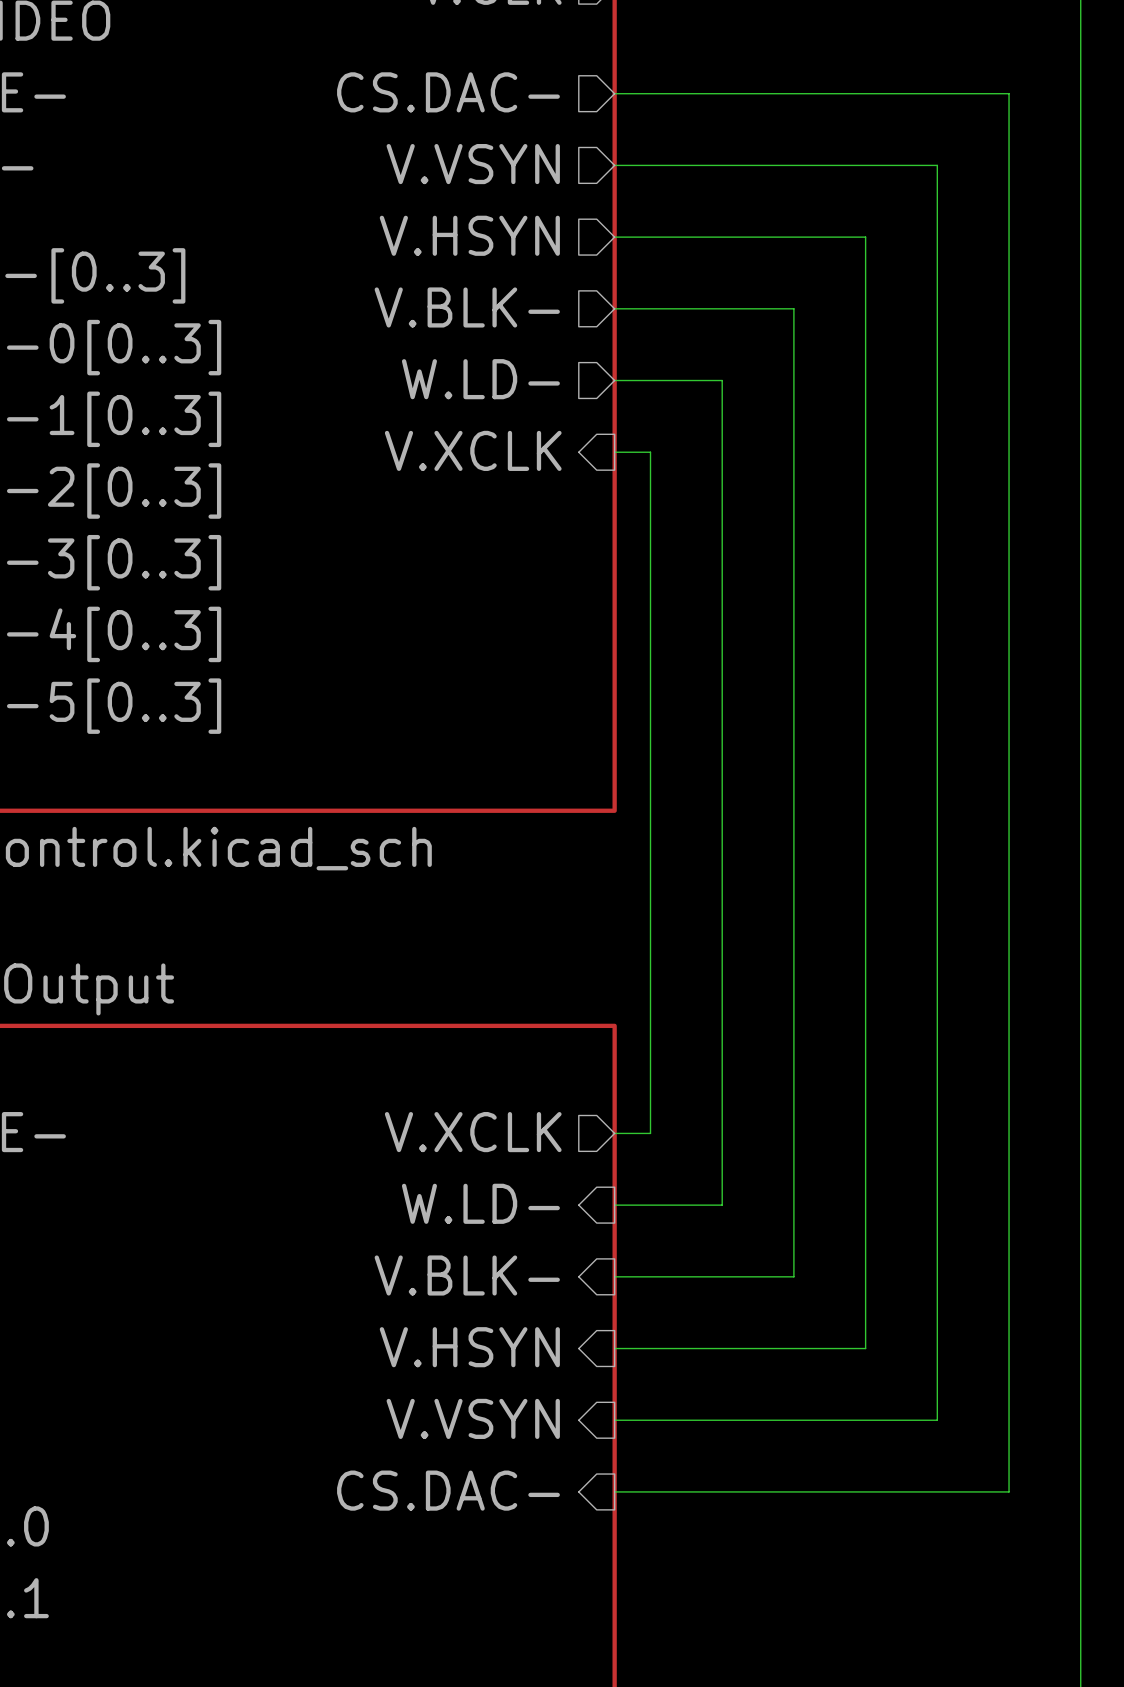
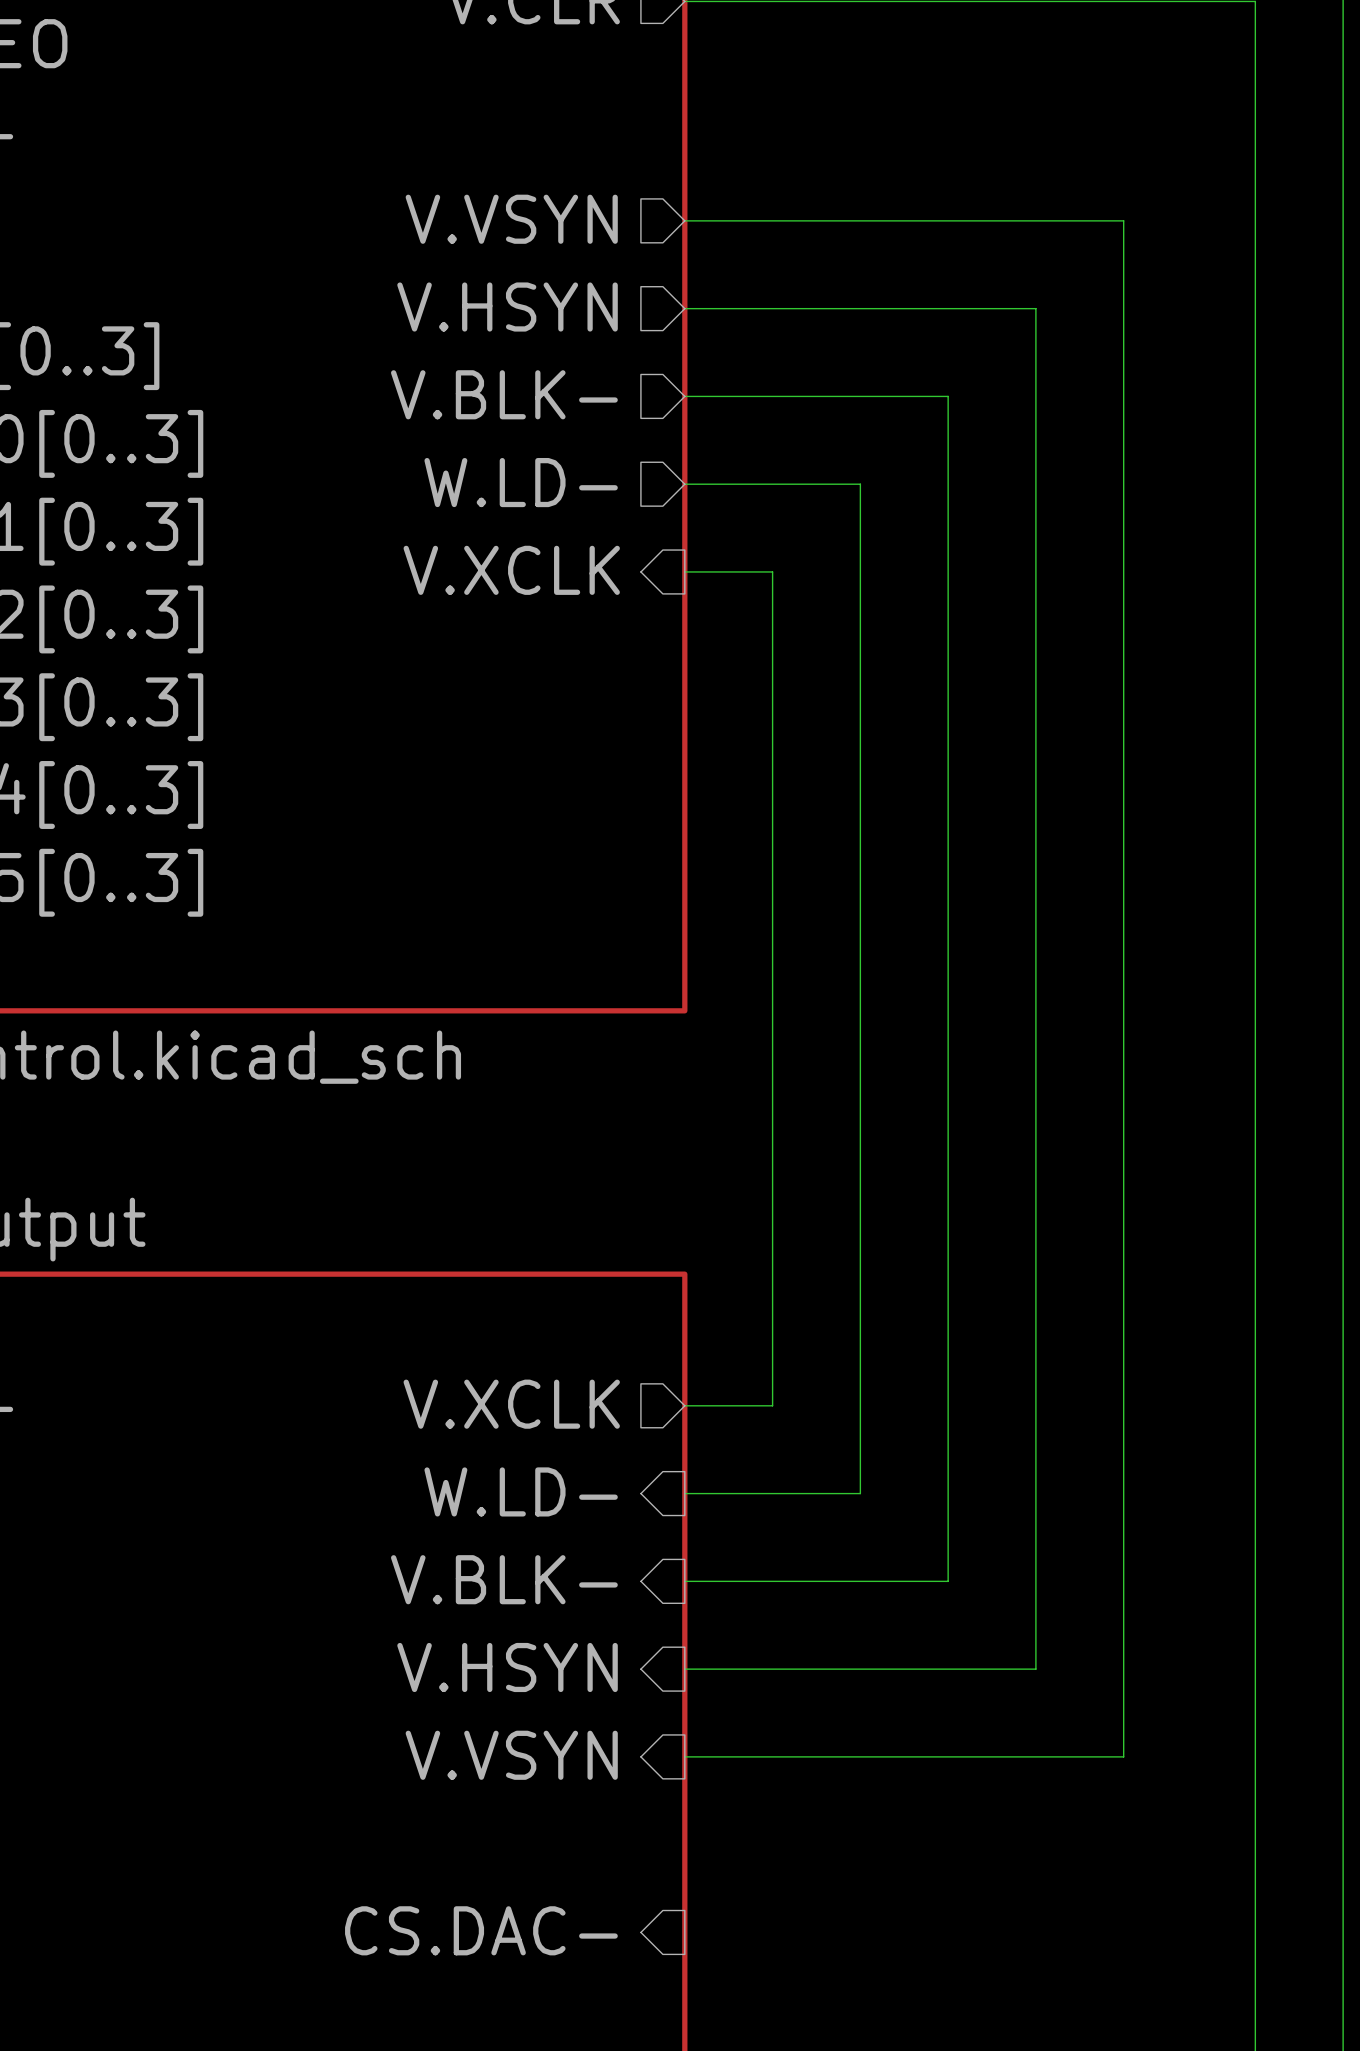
sheet pin: CS.DAC- (448, 92) -> none
wire: (614, 93) (1009, 93) (1009, 1491) (614, 1491) -> none
wire: (937, 165) (937, 1420) -> (1079, 220) (1123, 220) (1123, 1756) (1079, 1756)
wire: (865, 237) (865, 1348) -> (992, 308) (1035, 308) (1035, 1669) (992, 1669)
wire: (793, 308) (793, 1276) -> (904, 396) (948, 396) (948, 1581) (904, 1581)
wire: (722, 380) (722, 1205) -> (816, 484) (860, 484) (860, 1493) (816, 1493)
wire: (650, 452) (650, 1133) -> (728, 571) (772, 571) (772, 1405) (728, 1405)
sheet pin position: CS.DAC- (448, 1490) -> CS.DAC- (481, 1930)

